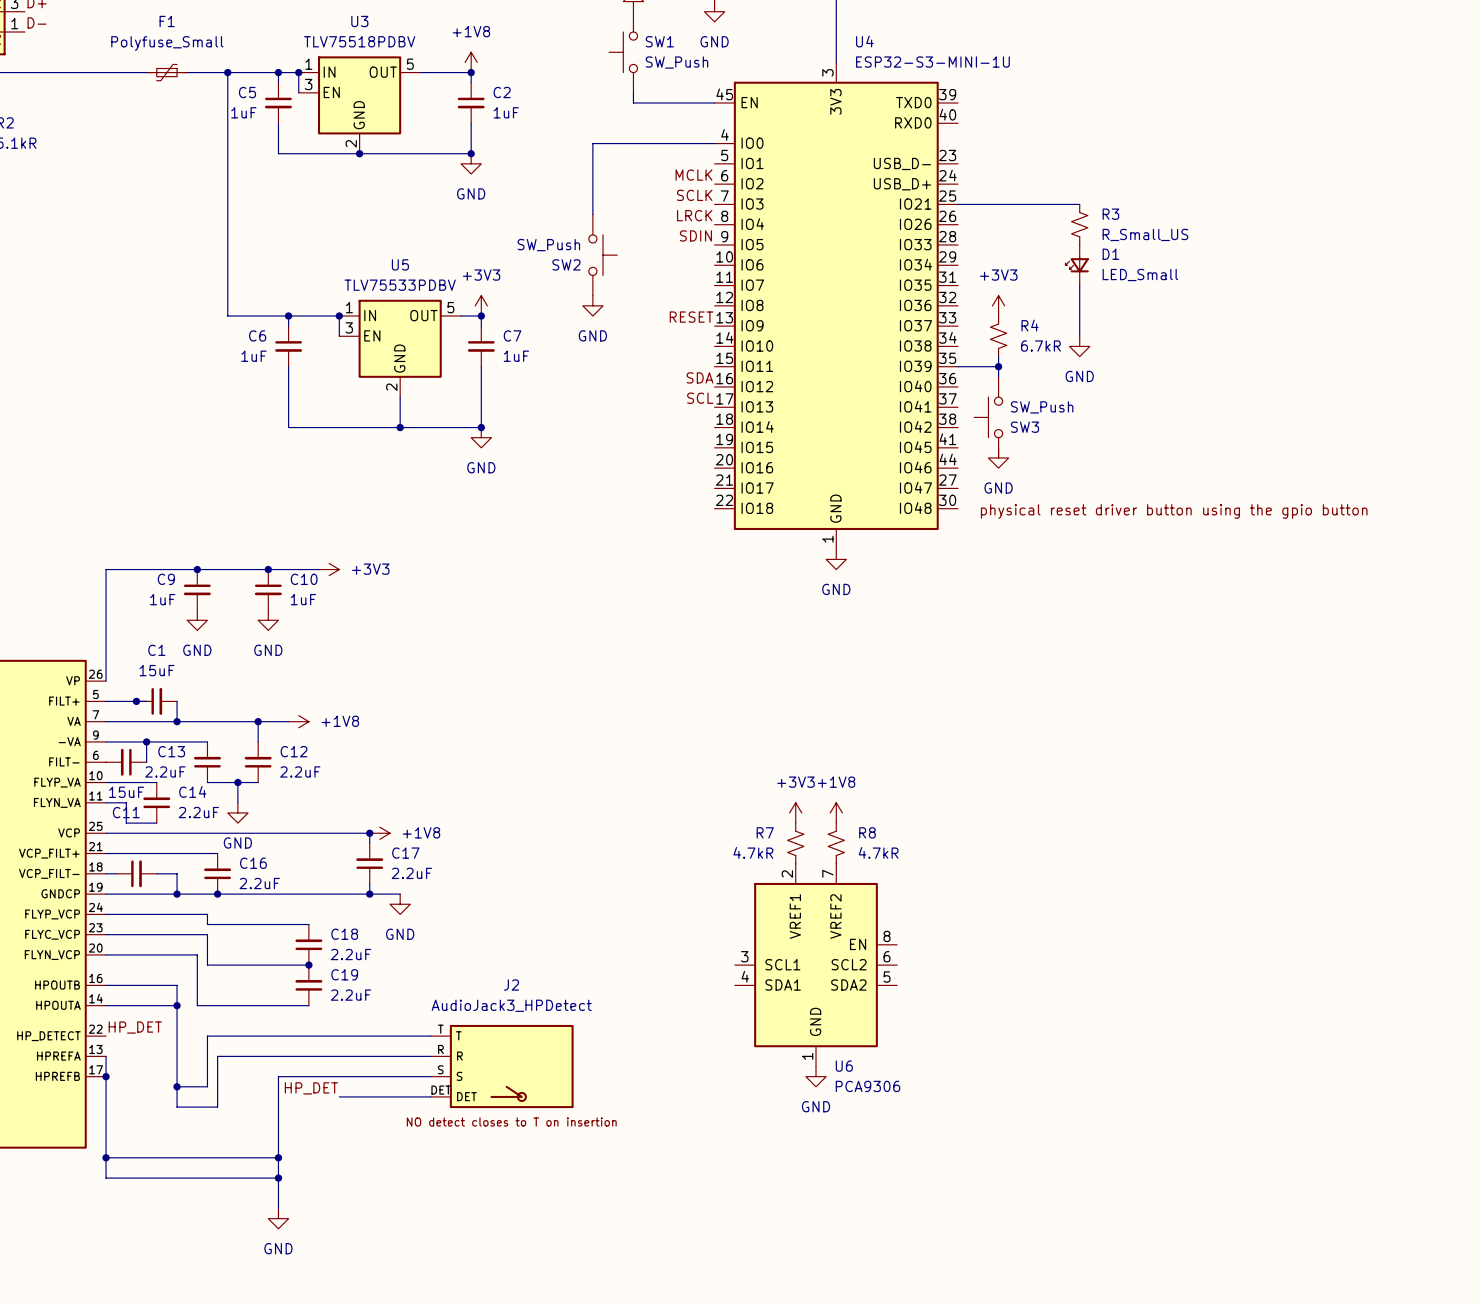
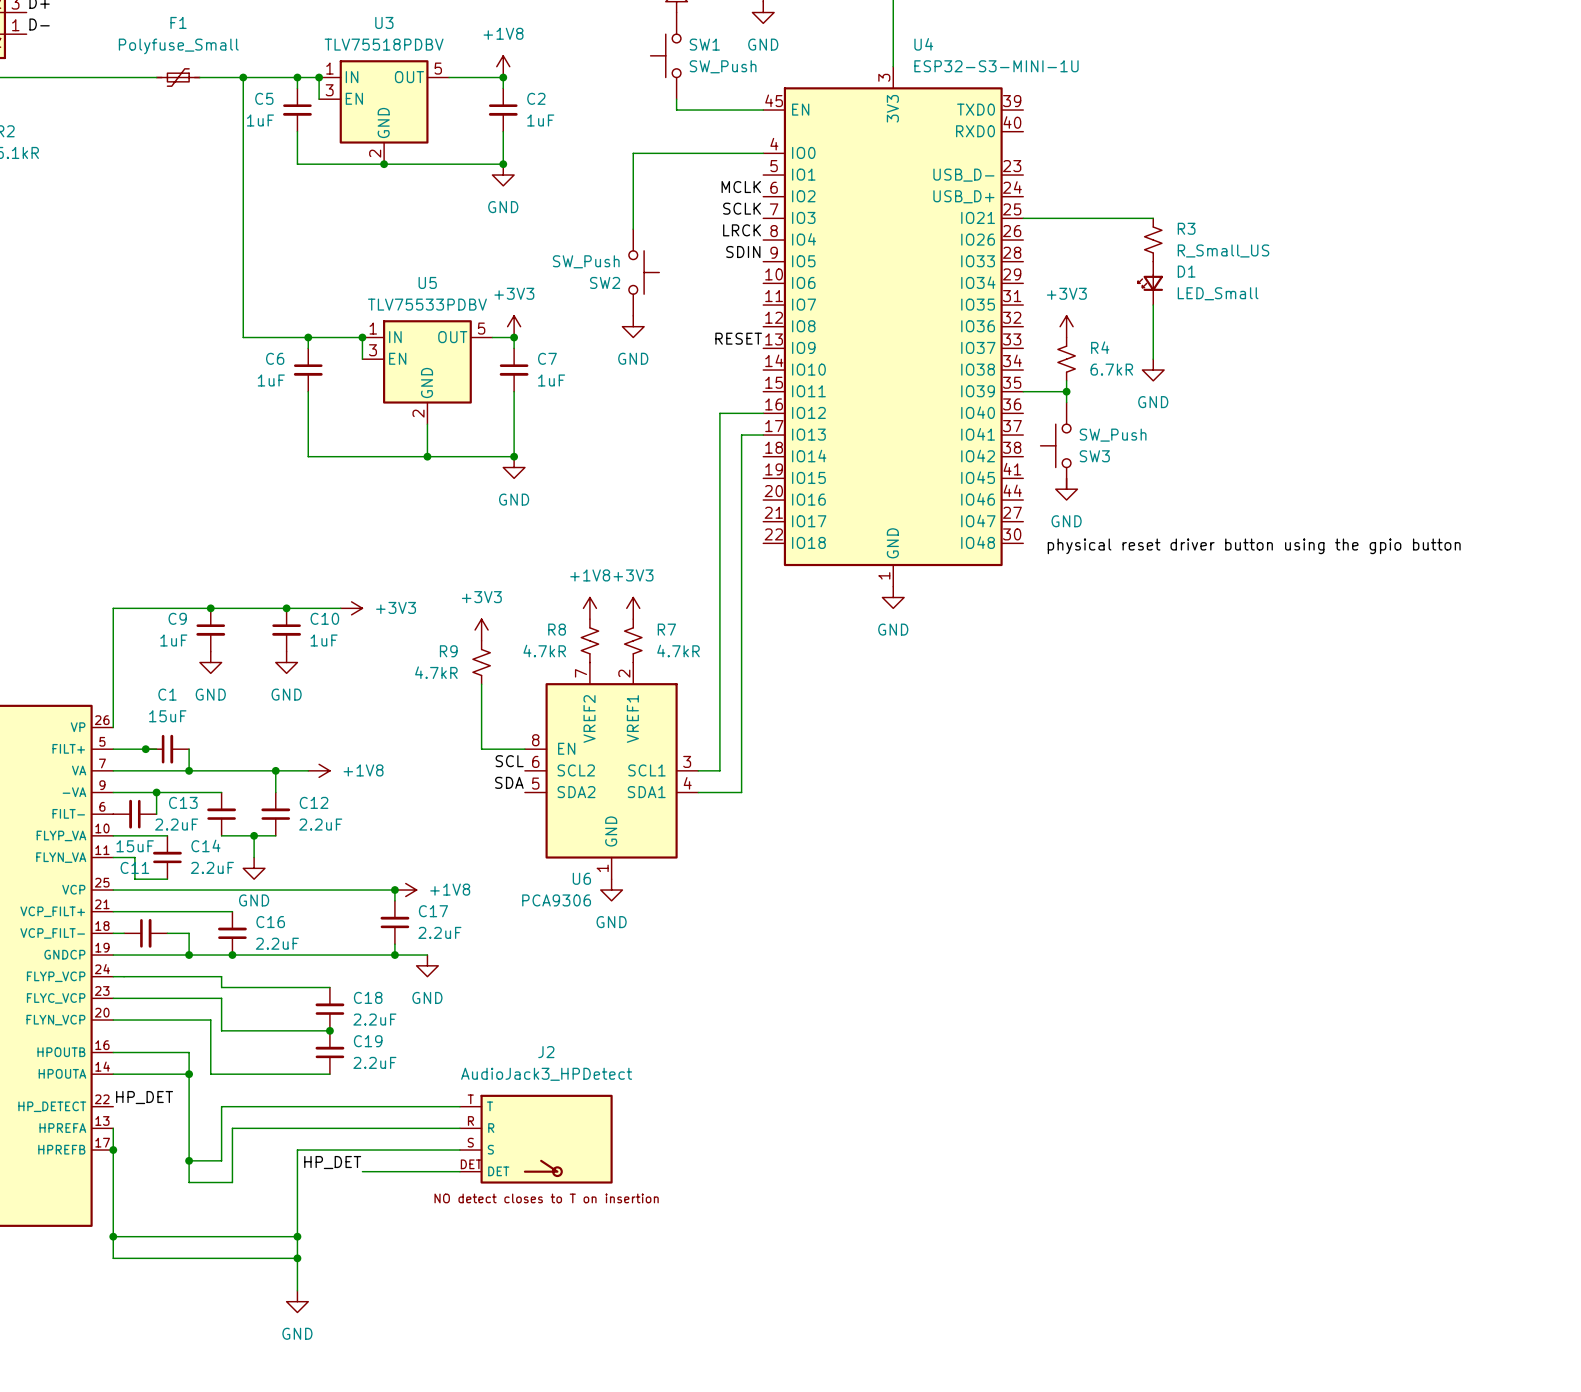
label: SDA (700, 377) -> none
wire: none -> (763, 413) (719, 413) (719, 770) (698, 770)
label: SCL (700, 398) -> none
wire: none -> (763, 435) (741, 435) (741, 792) (698, 792)
power symbol: none -> +1V8 (589, 608)
power symbol: none -> +3V3 (633, 608)
power symbol: none -> +3V3 (481, 630)
R9: none -> 4.7kR (481, 662)
wire: none -> (481, 684) (481, 749) (524, 749)
label: none -> SCL (509, 761)
label: none -> SDA (509, 782)
power symbol: +3V3 (795, 812) -> none
power symbol: +1V8 (836, 812) -> none
power symbol: none -> GND (611, 890)
R7 flip: as is (795, 843) -> left-right (633, 640)
R7 position: (795, 843) -> (633, 640)
R8 flip: as is (836, 843) -> left-right (589, 640)
R8 position: (836, 843) -> (589, 640)
U6 flip: as is (816, 965) -> left-right (611, 770)
U6 position: (816, 965) -> (611, 770)
power symbol: GND (816, 1076) -> none

